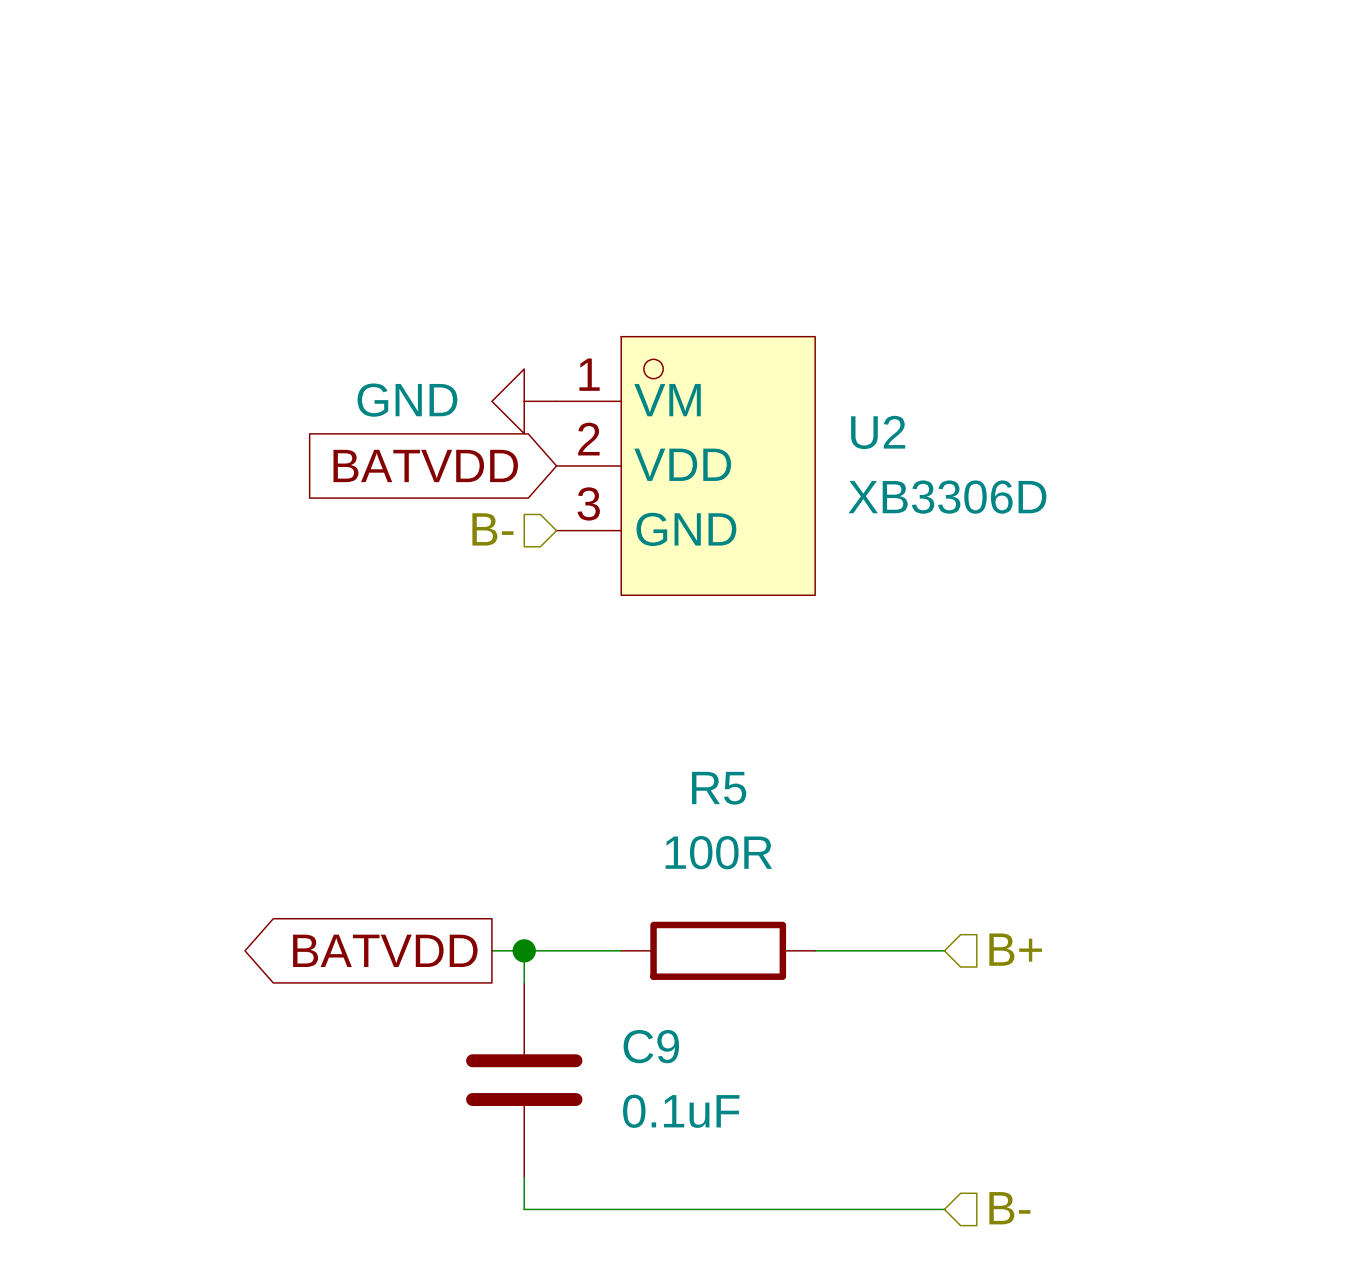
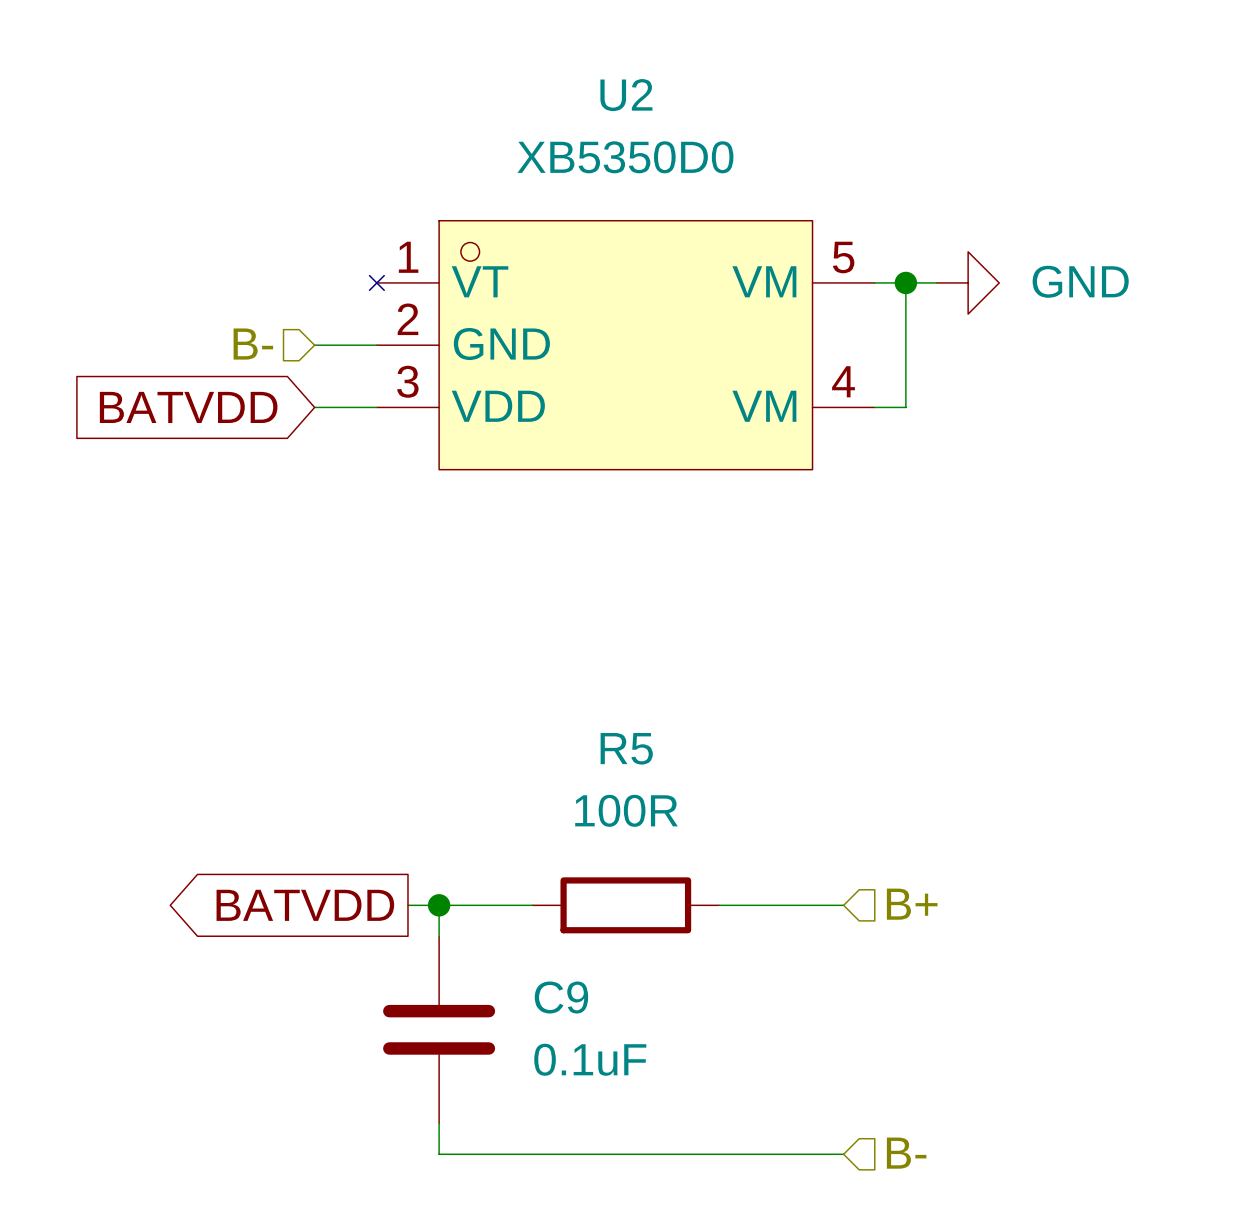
wire: none -> (874, 282) (937, 282)
wire: none -> (905, 282) (905, 407) (874, 407)
junction: none -> (905, 282)
U2 symbol: [556, 336, 816, 596] -> [369, 220, 875, 470]
wire: none -> (314, 345) (376, 345)
power symbol rotation: 0° (524, 401) -> 180° (968, 282)
power symbol position: GND (524, 401) -> GND (968, 282)
U2 name position: U2 (878, 432) -> U2 (626, 95)
global label position: BATVDD (425, 465) -> BATVDD (188, 407)
U2 value: XB3306D (947, 497) -> XB5350D0 (625, 157)
hierarchical label position: B- (492, 529) -> B- (253, 344)

